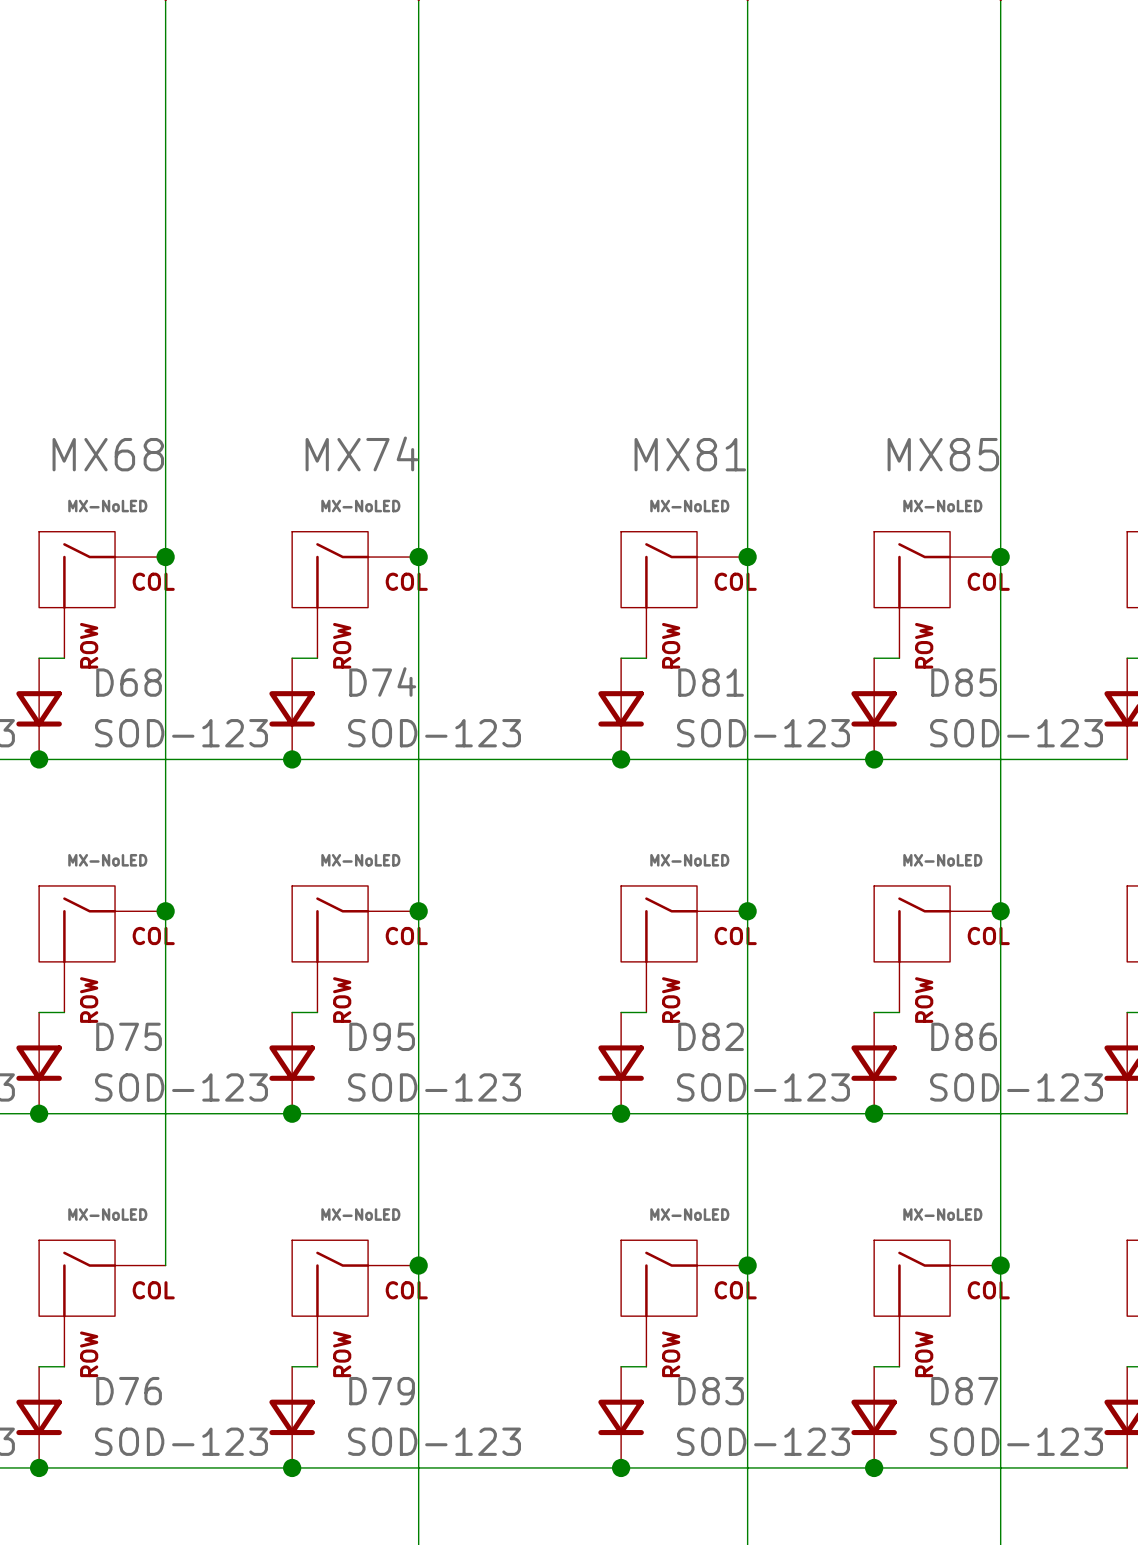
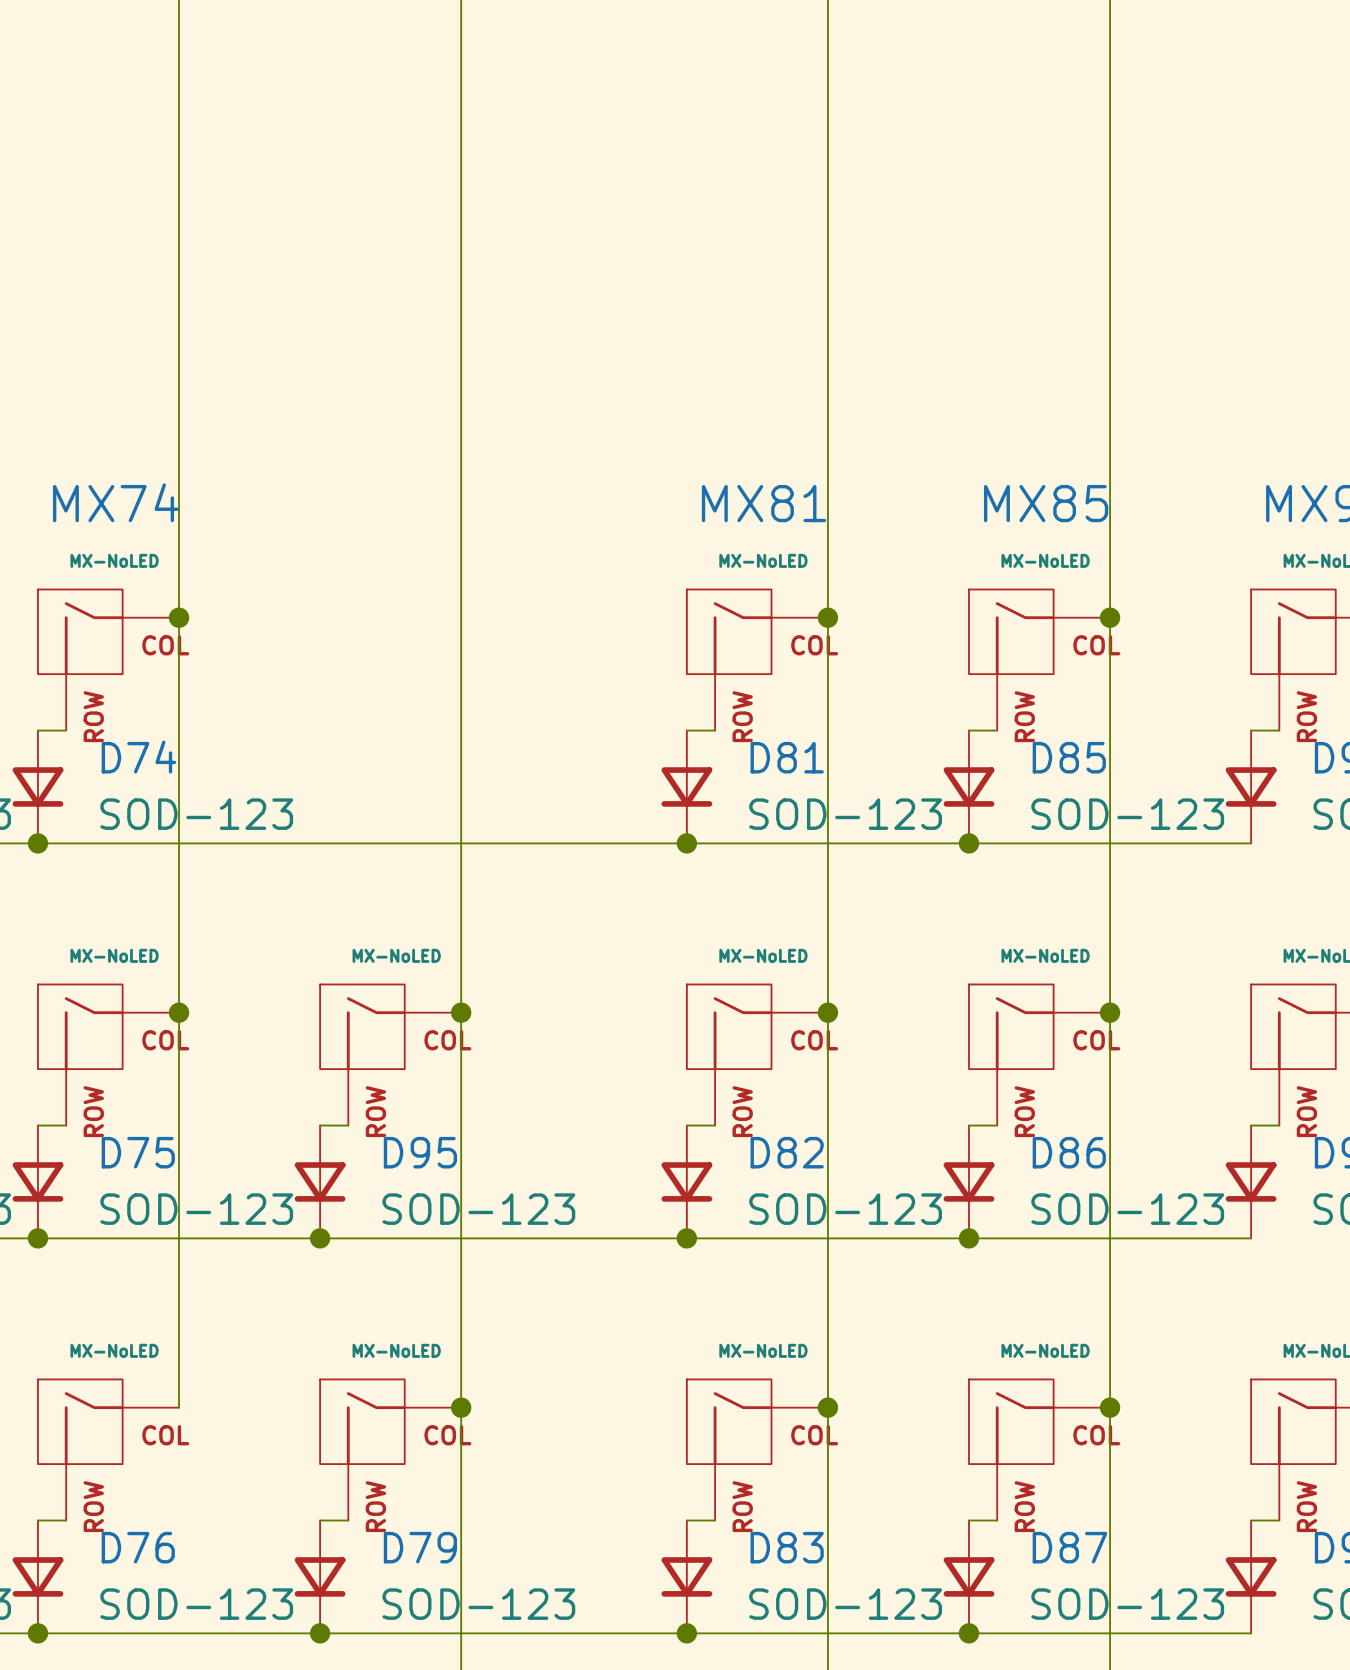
MX68 name: MX68 (108, 454) -> MX74 (115, 502)
junction: (418, 557) -> none
MX74: MX-NoLED (355, 594) -> none
wire: (292, 658) (317, 658) -> none
D68 name: D68 (129, 682) -> D74 (138, 757)
D74: SOD-123 (292, 708) -> none
junction: (292, 759) -> none

